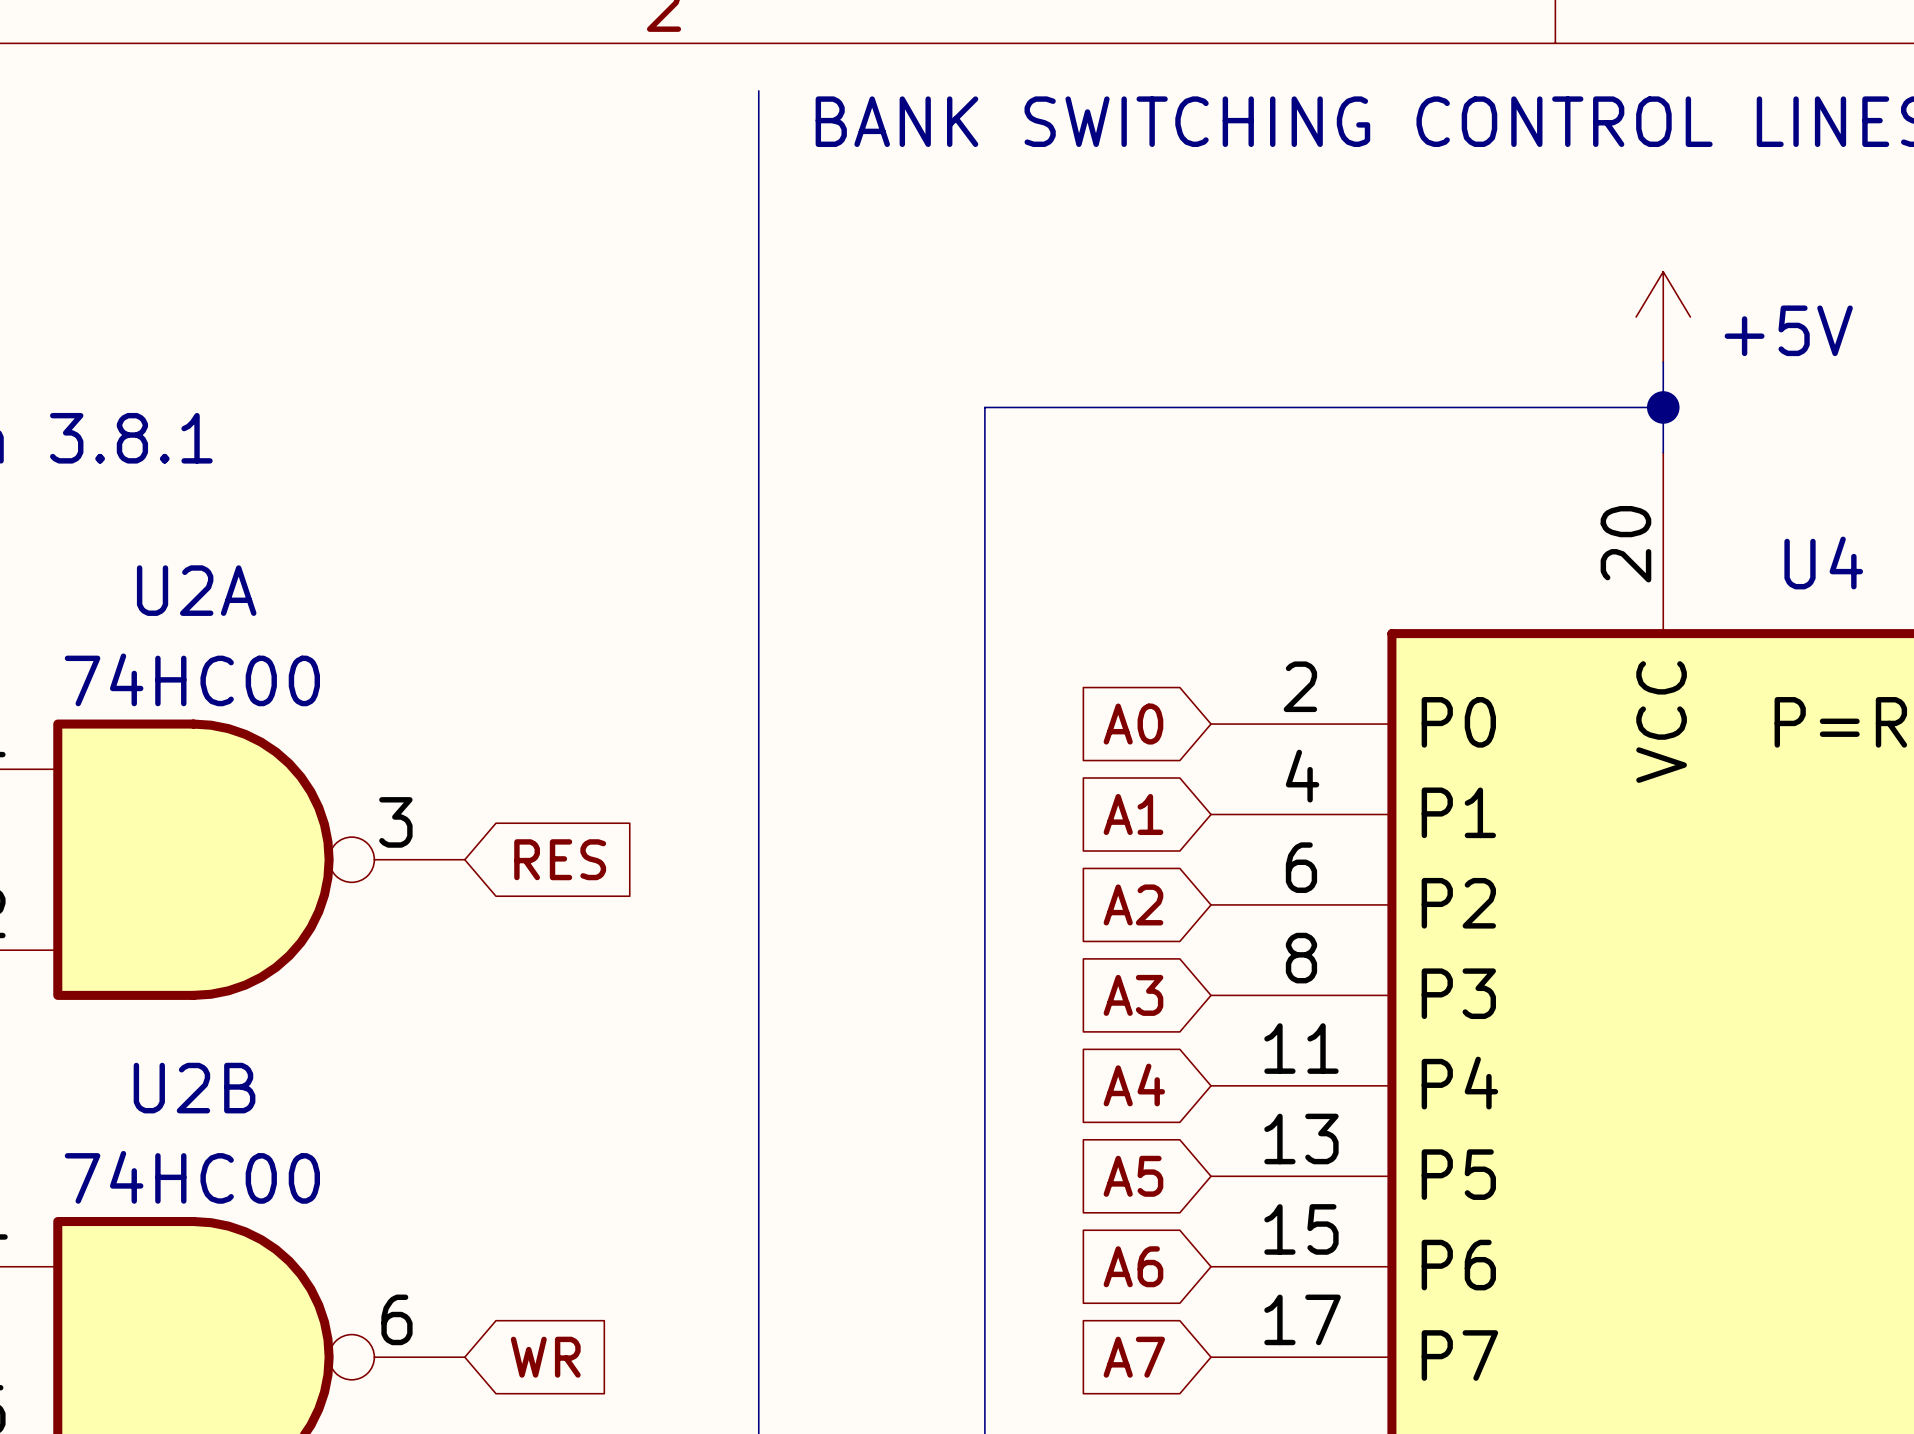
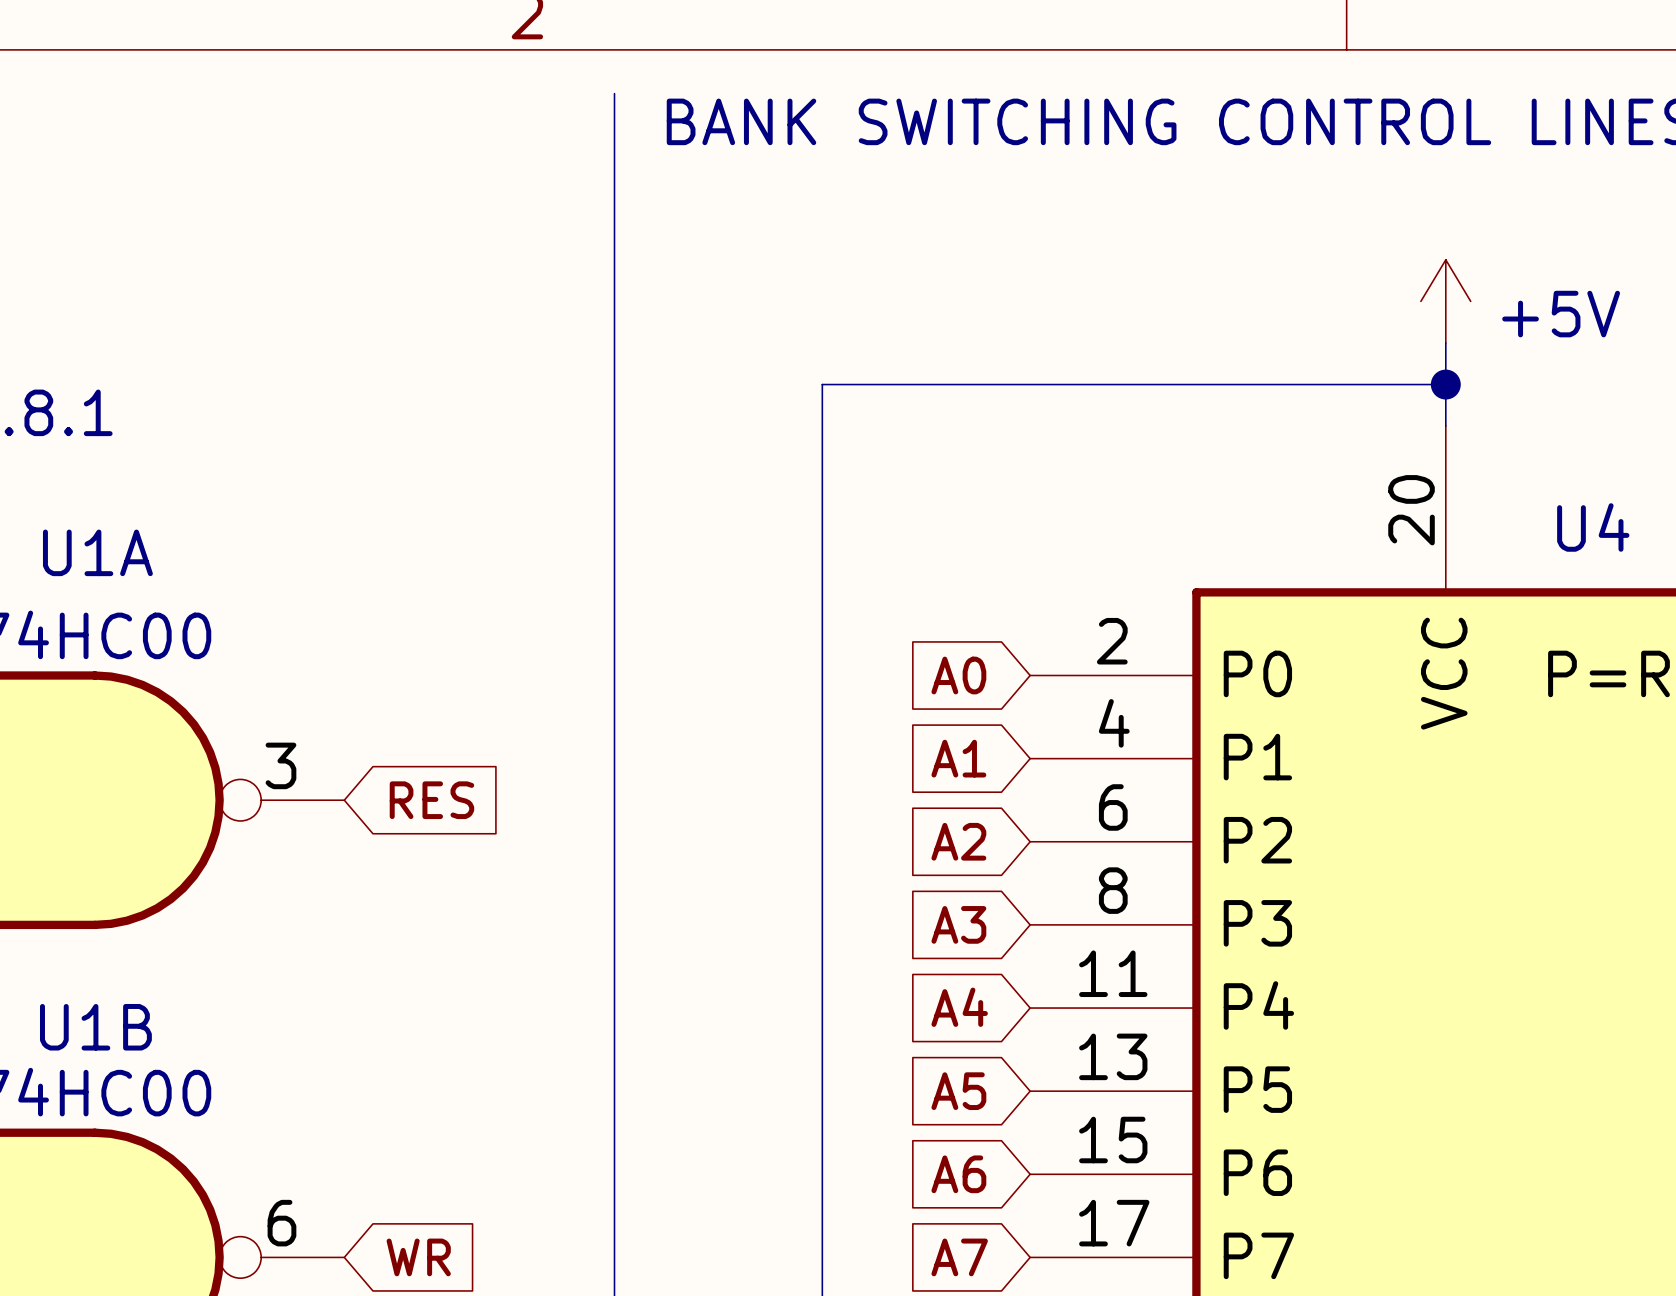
U2A name: U2A (196, 590) -> U1A (97, 552)
U2B name: U2B (194, 1088) -> U1B (95, 1027)

